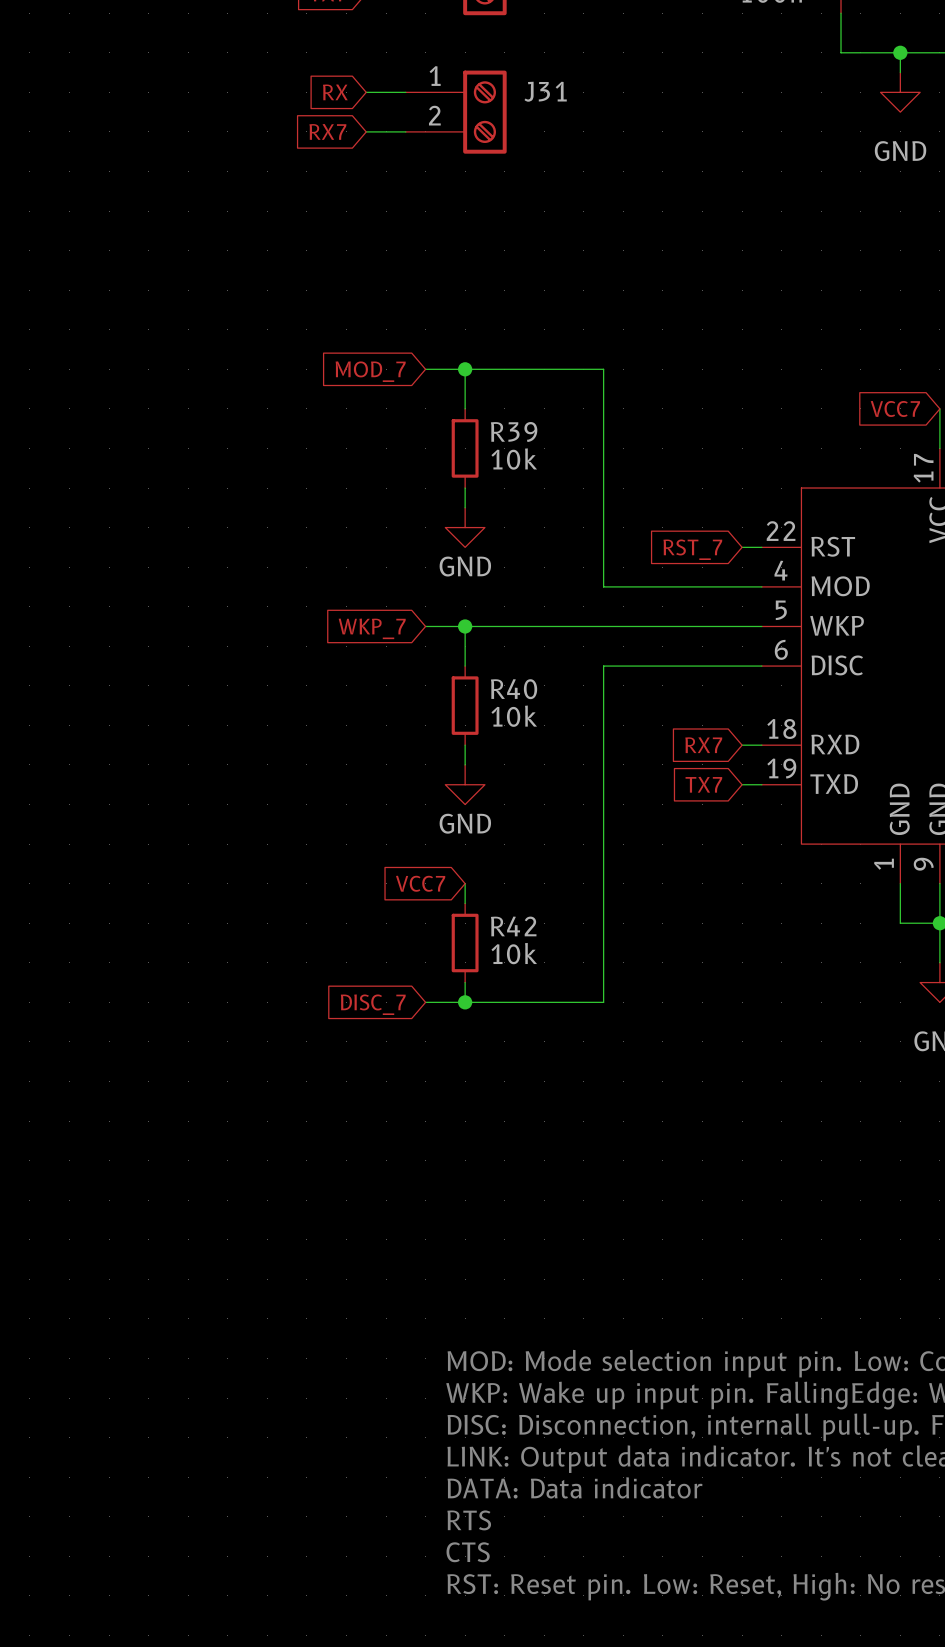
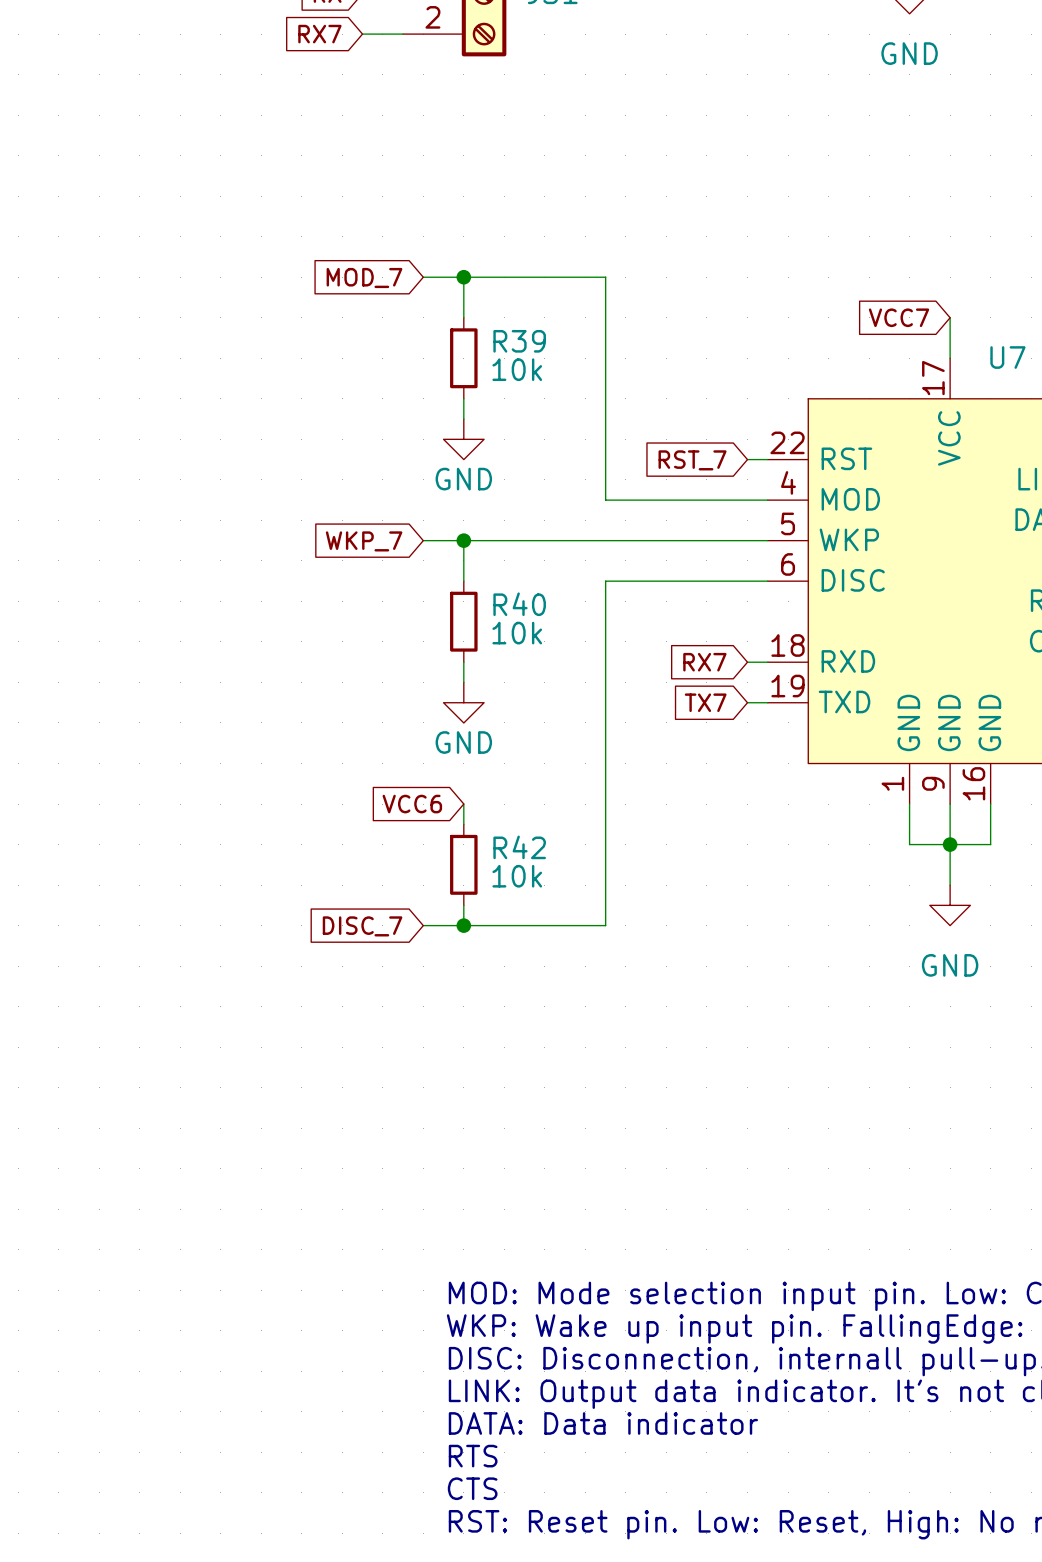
global label: VCC7 (420, 883) -> VCC6 (412, 804)

